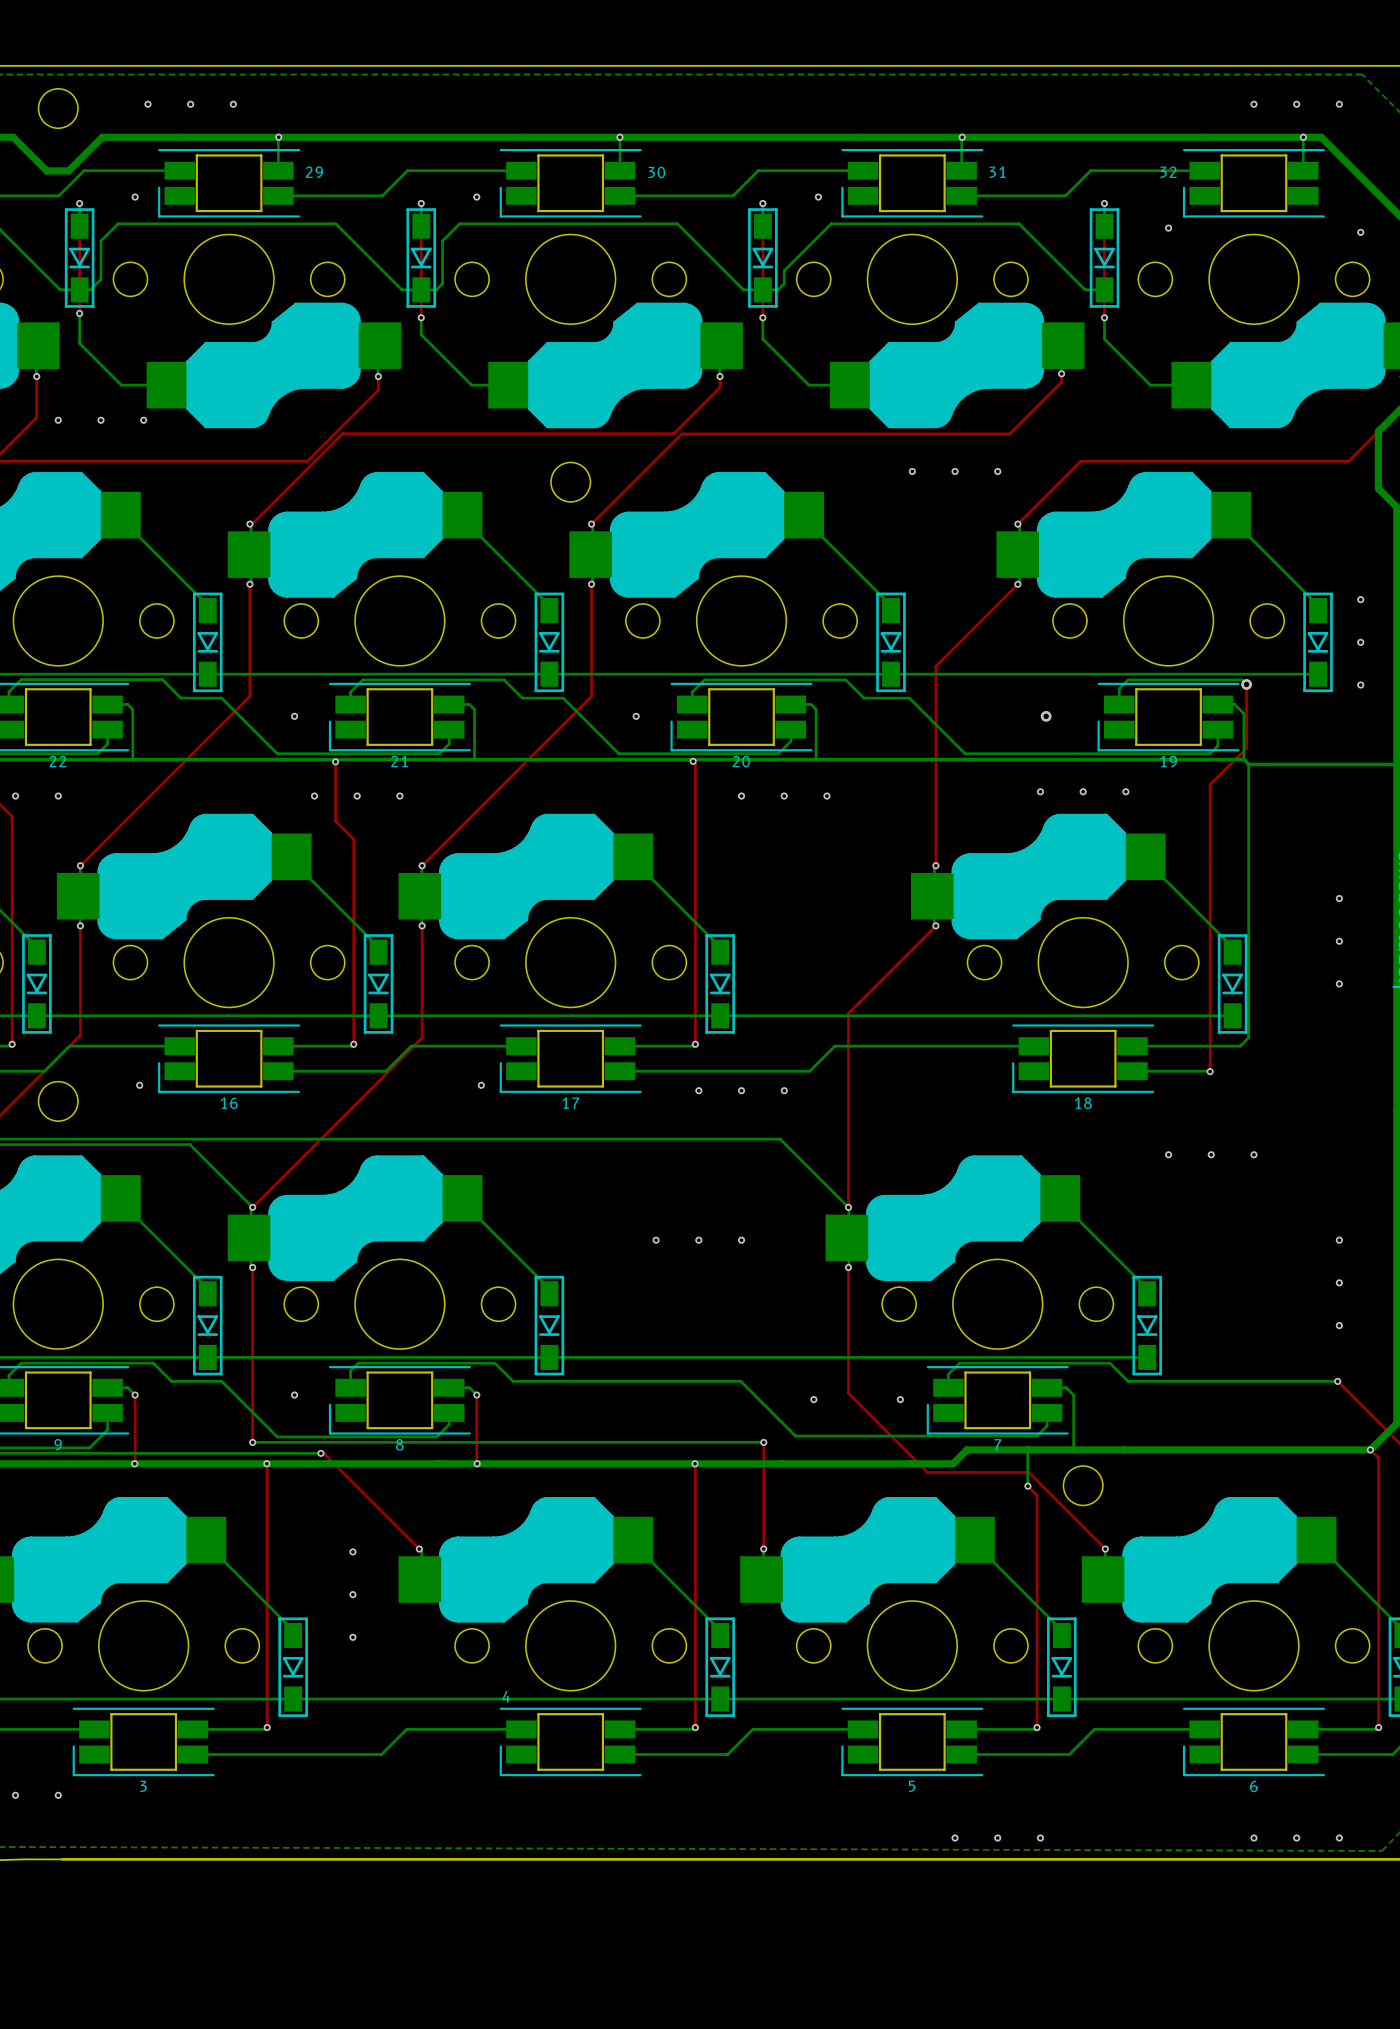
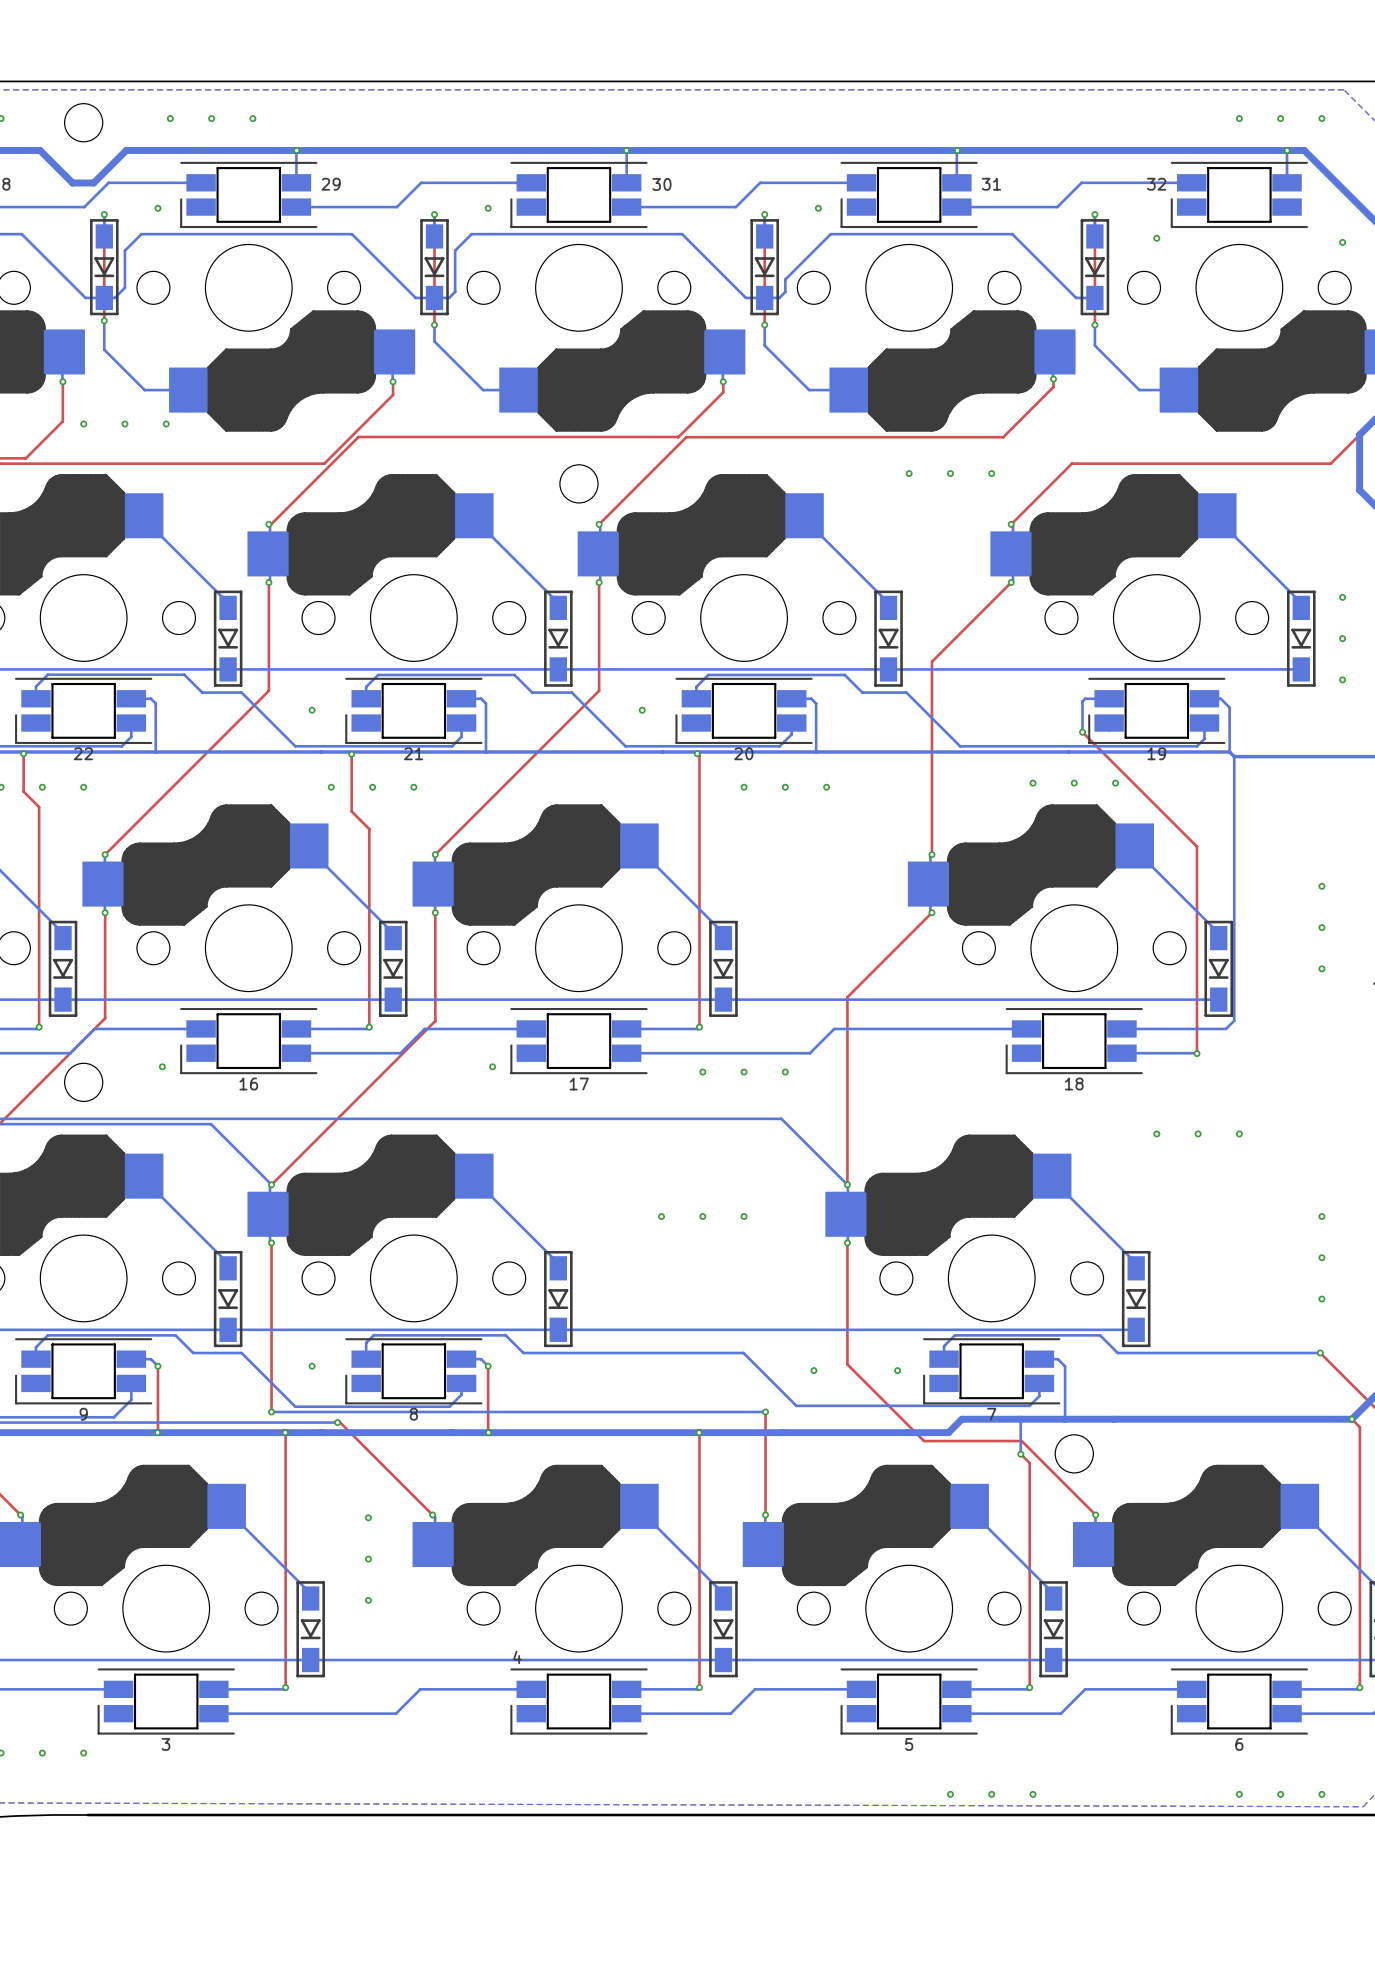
bottom track: (1246, 684) (1242, 679) (1128, 679) (1119, 688) (1119, 704) -> (1082, 732) (1082, 701) (1085, 698) (1109, 698)
top track: (1246, 684) (1246, 748) (1210, 784) (1210, 857) -> (1082, 732) (1197, 846)
via: (1246, 684) -> none
via: (1046, 716) -> none
via: none -> (1082, 732)

